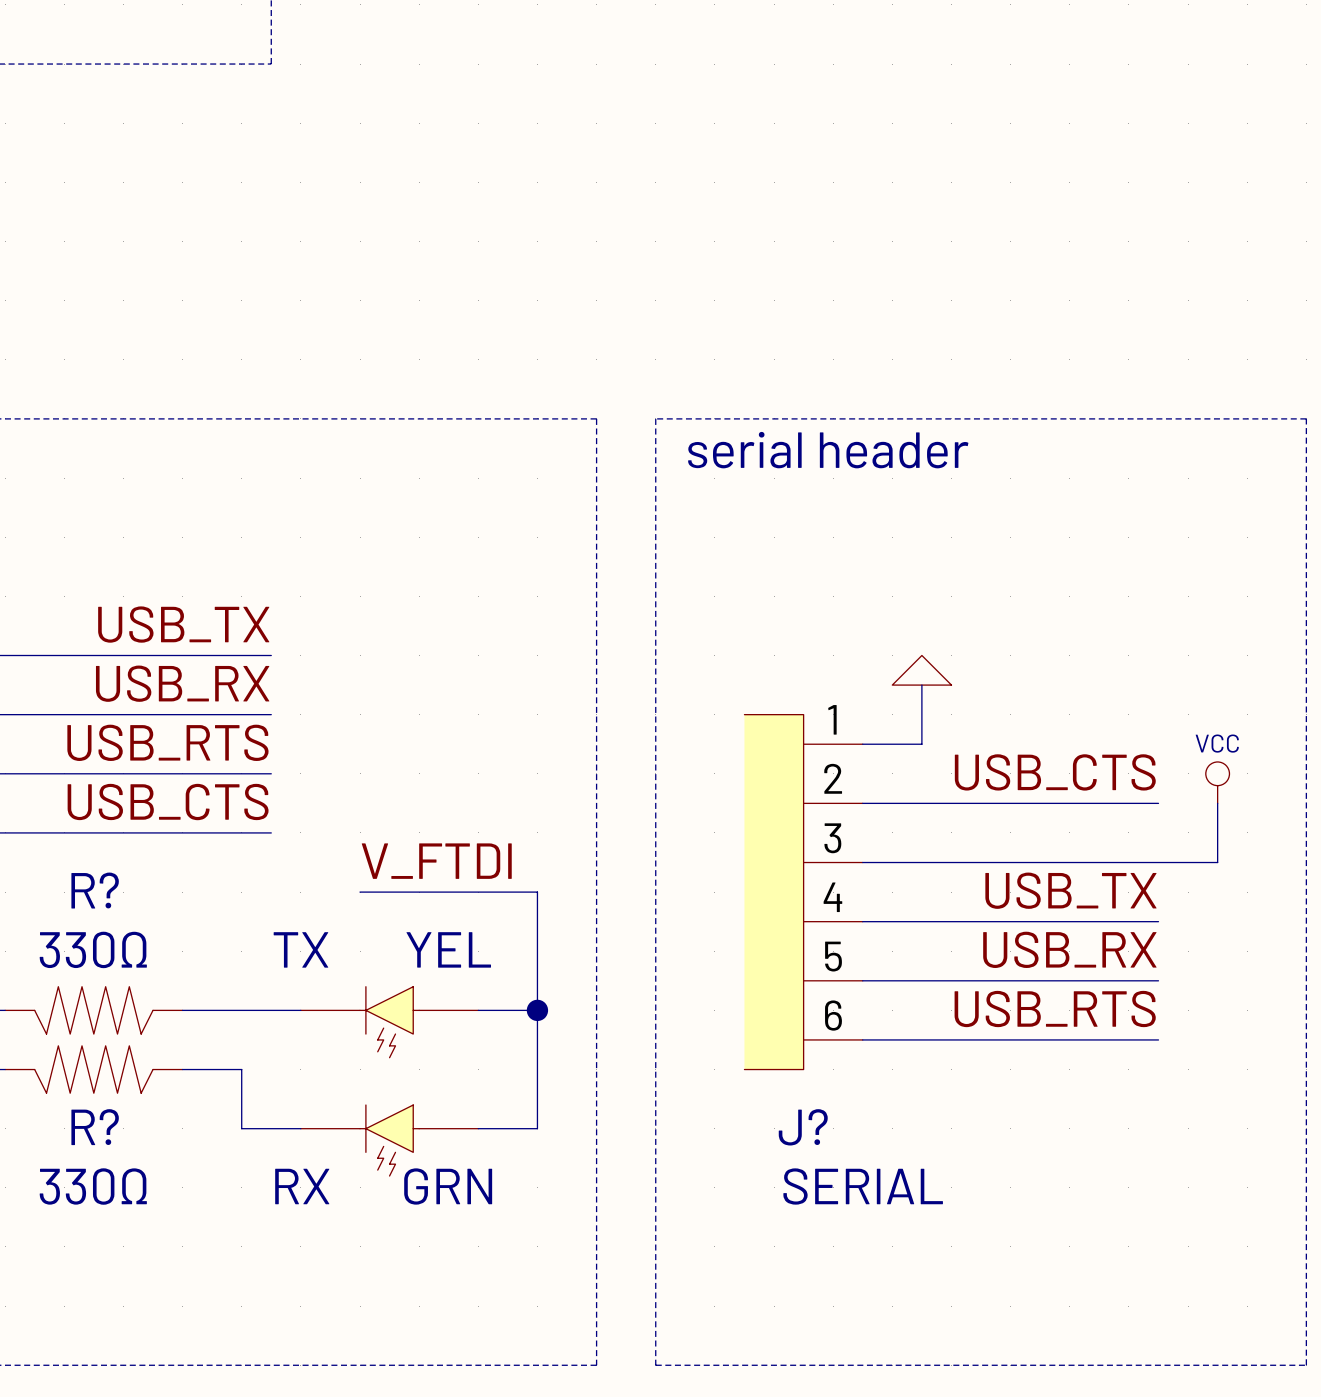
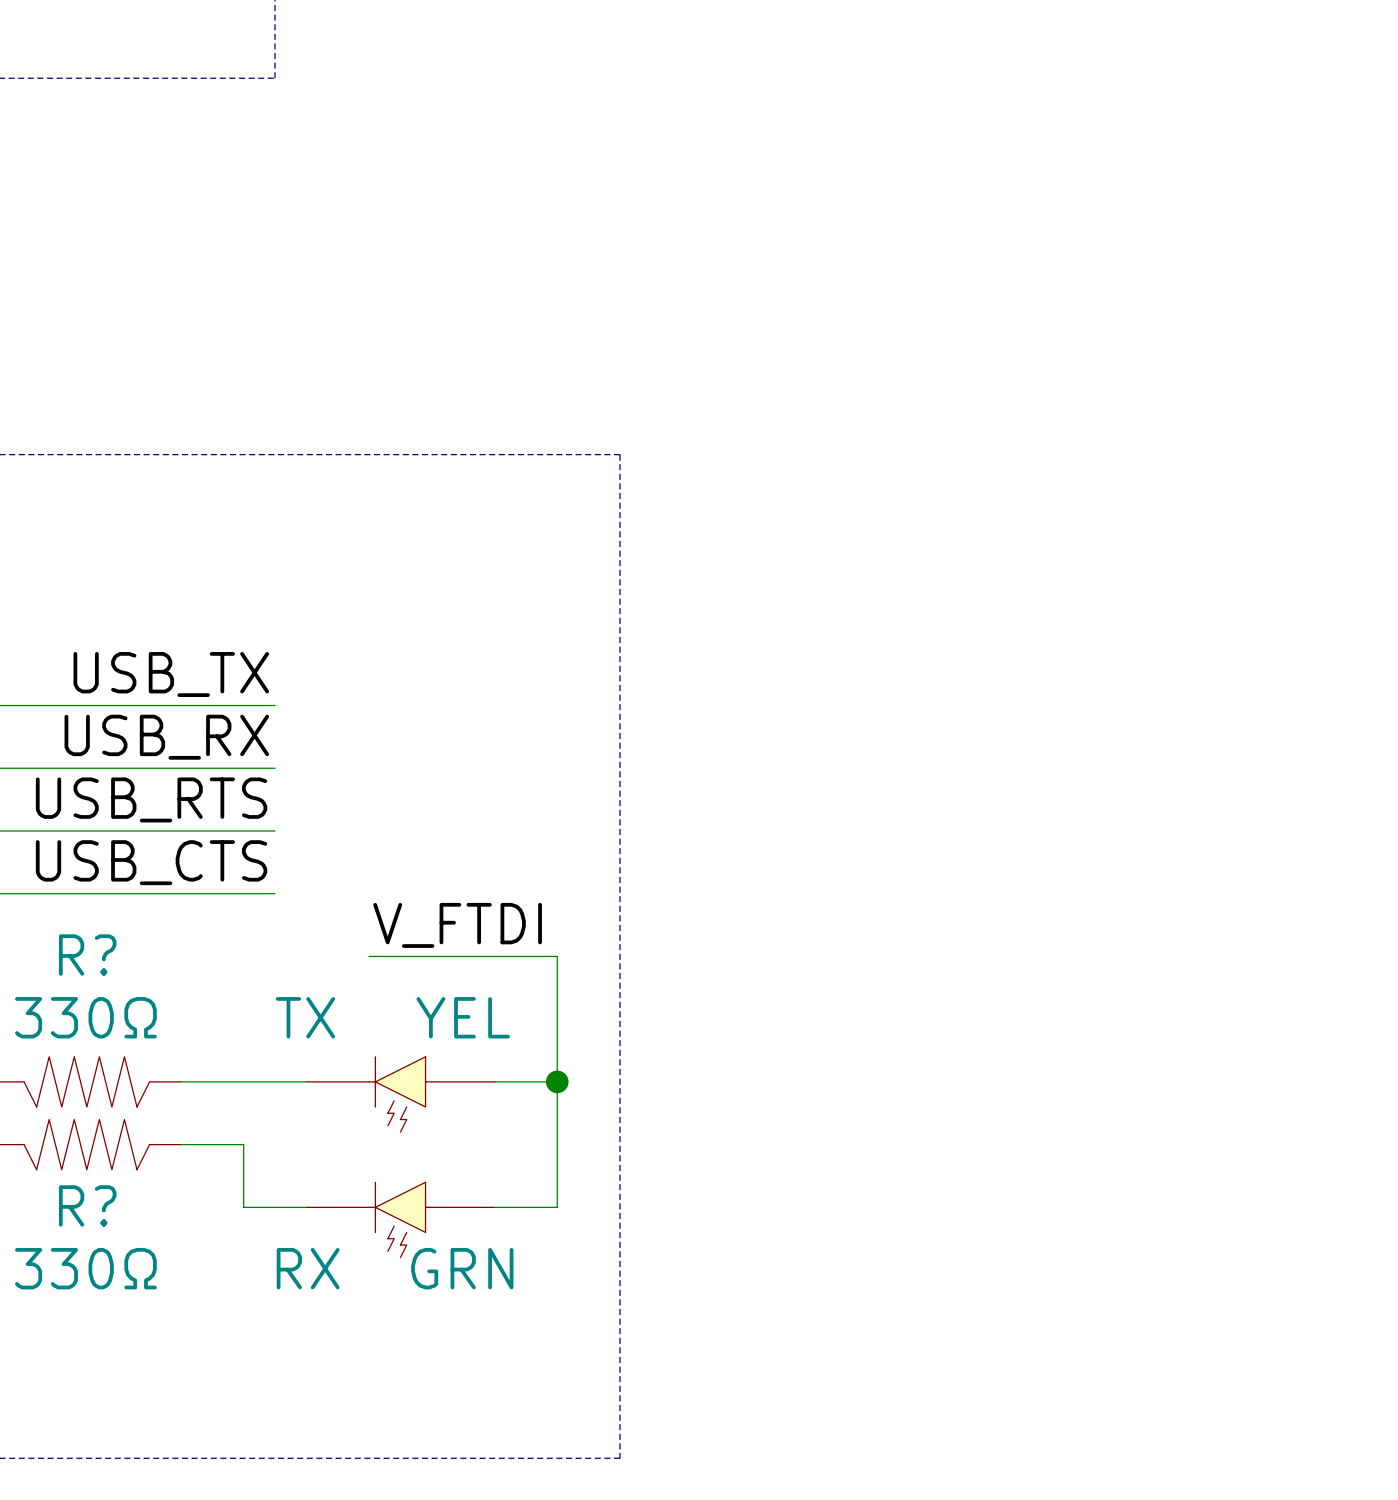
line: (655, 418) (655, 1365) (1306, 1365) (1306, 418) (655, 418) -> none
text: serial header (828, 450) -> none
power symbol: (921, 670) -> none
wire: (921, 685) (921, 744) (862, 744) -> none
label: USB_CTS (1055, 772) -> none
power symbol: VCC (1217, 782) -> none
wire: (862, 803) (1158, 803) -> none
wire: (1217, 803) (1217, 862) (862, 862) -> none
label: USB_TX (1070, 890) -> none
J?: SERIAL (803, 892) -> none
wire: (862, 921) (1158, 921) -> none
label: USB_RX (1069, 949) -> none
wire: (862, 980) (1158, 980) -> none
label: USB_RTS (1055, 1009) -> none
wire: (862, 1039) (1158, 1039) -> none

